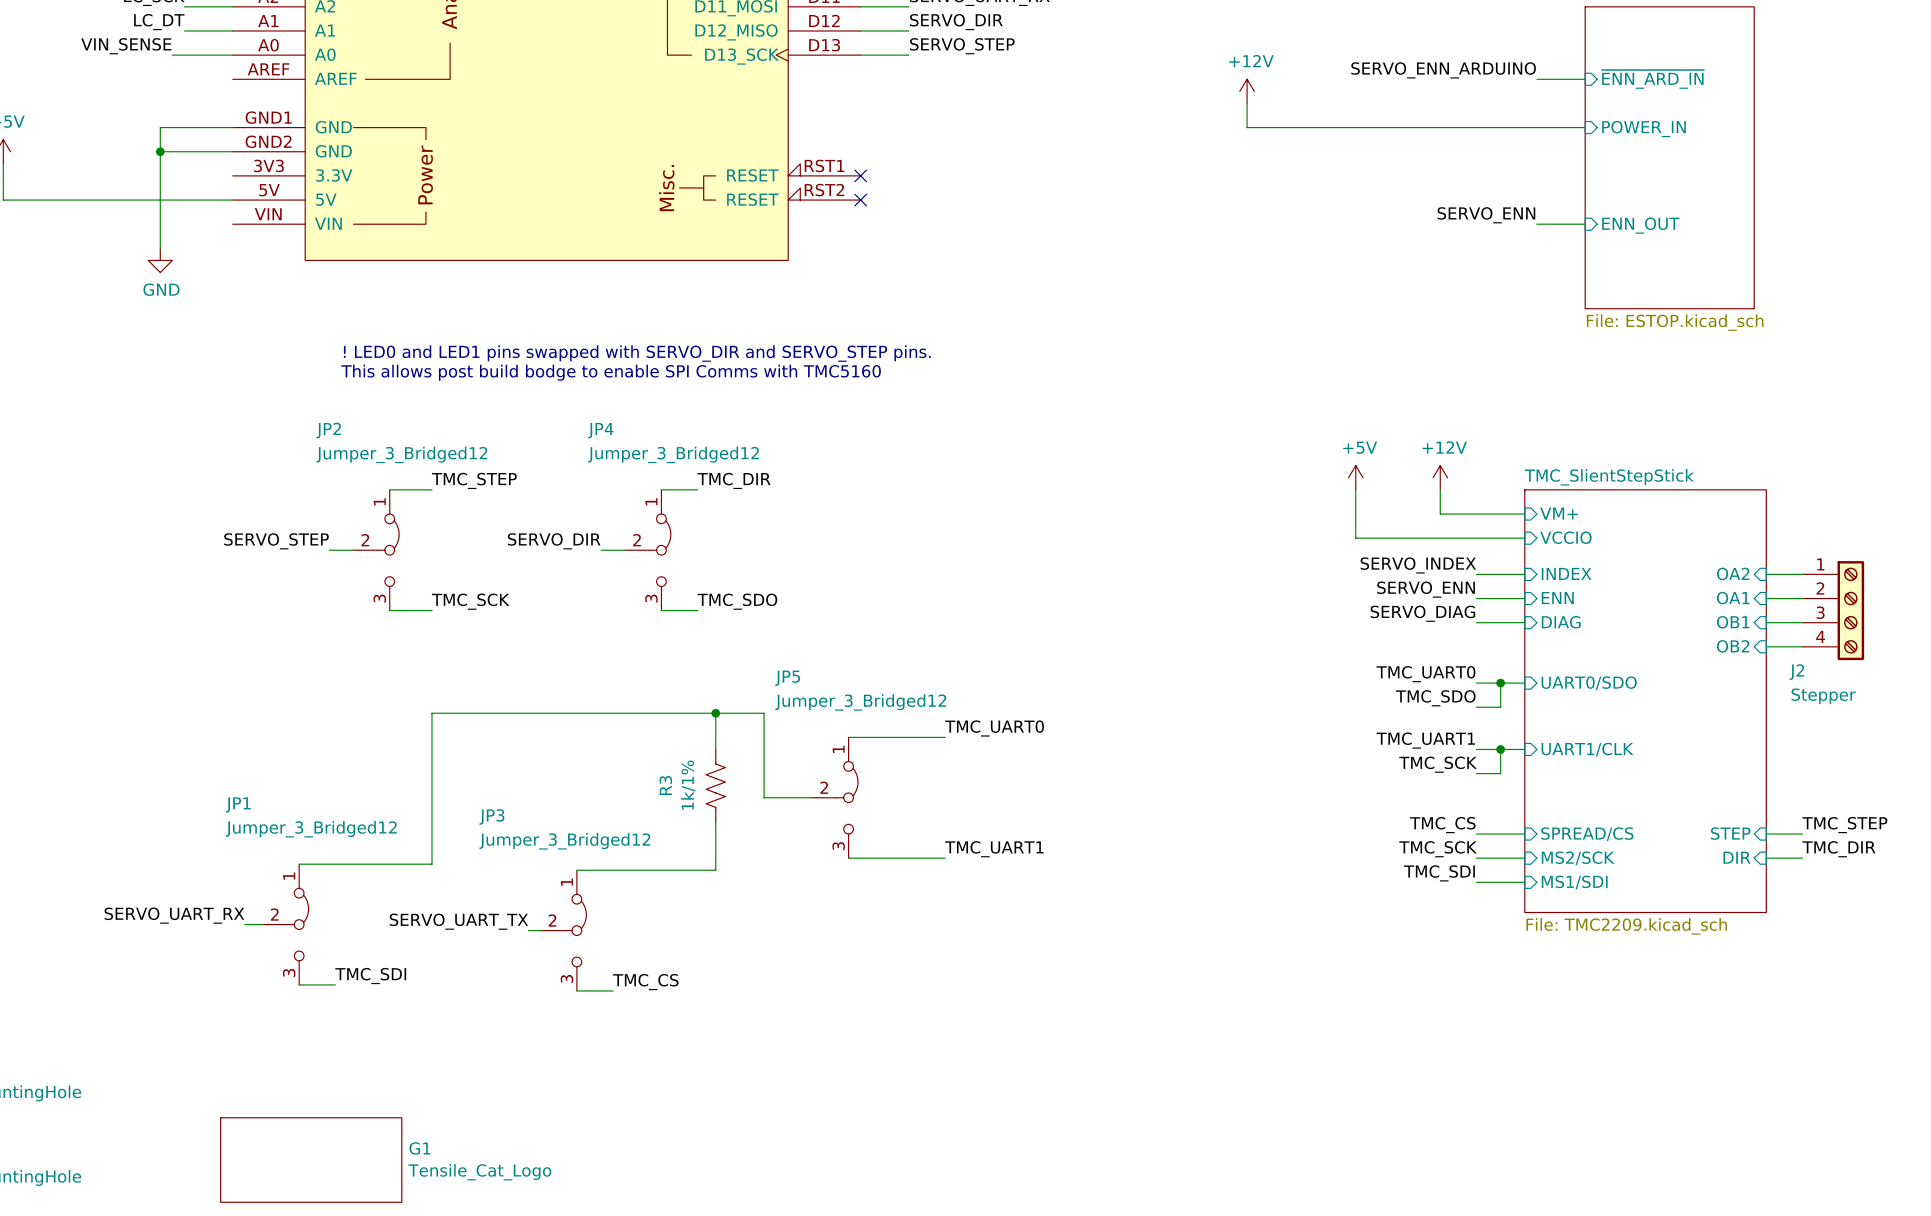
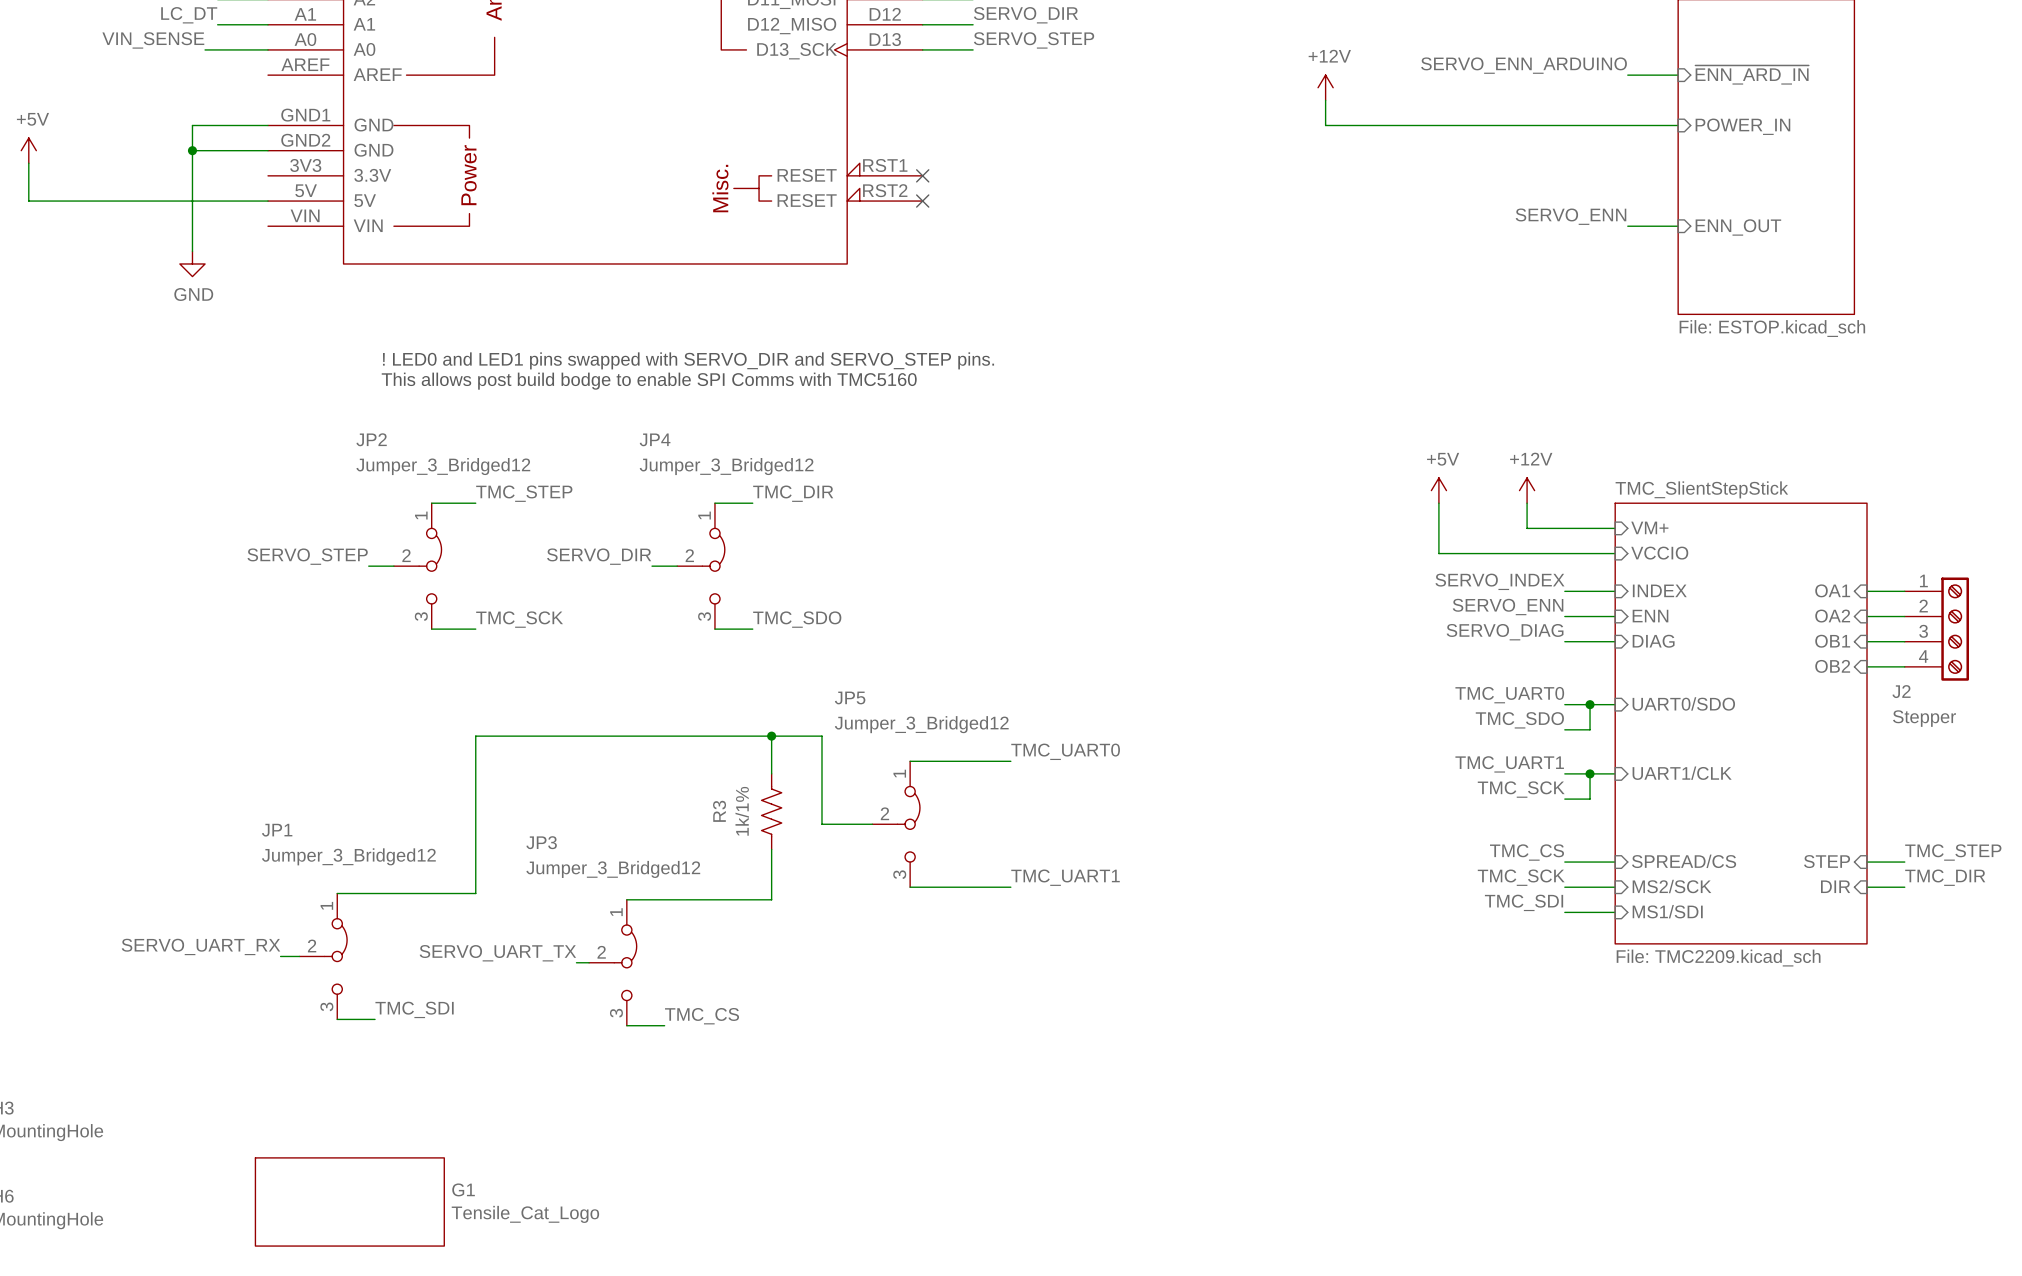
sheet pin: OA2 (1733, 573) -> OA1 (1832, 590)
sheet pin: OA1 (1733, 598) -> OA2 (1832, 616)

